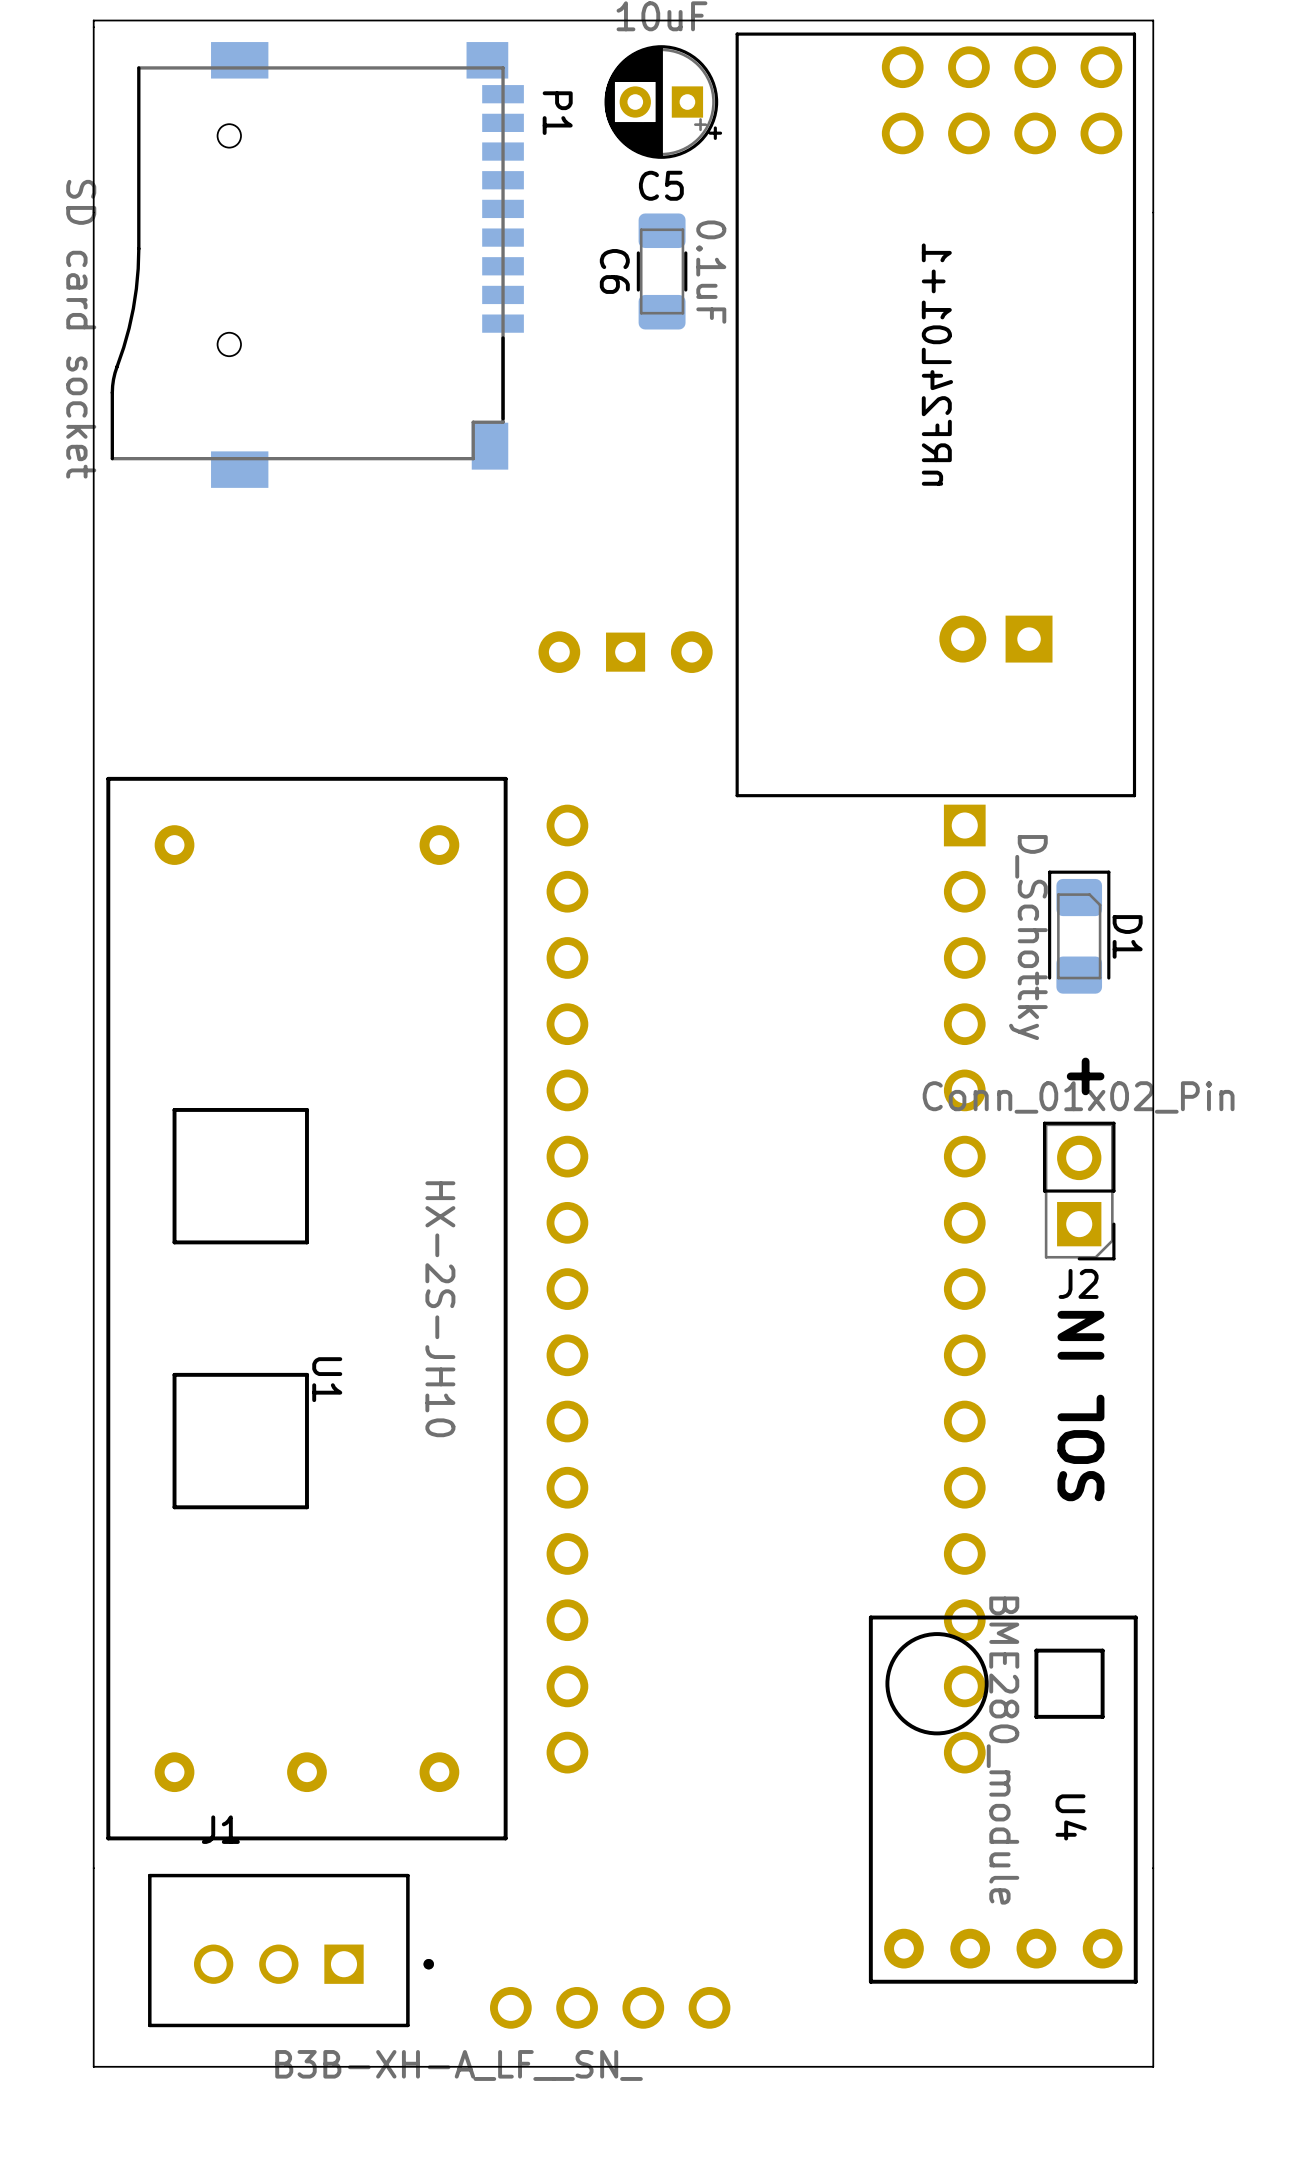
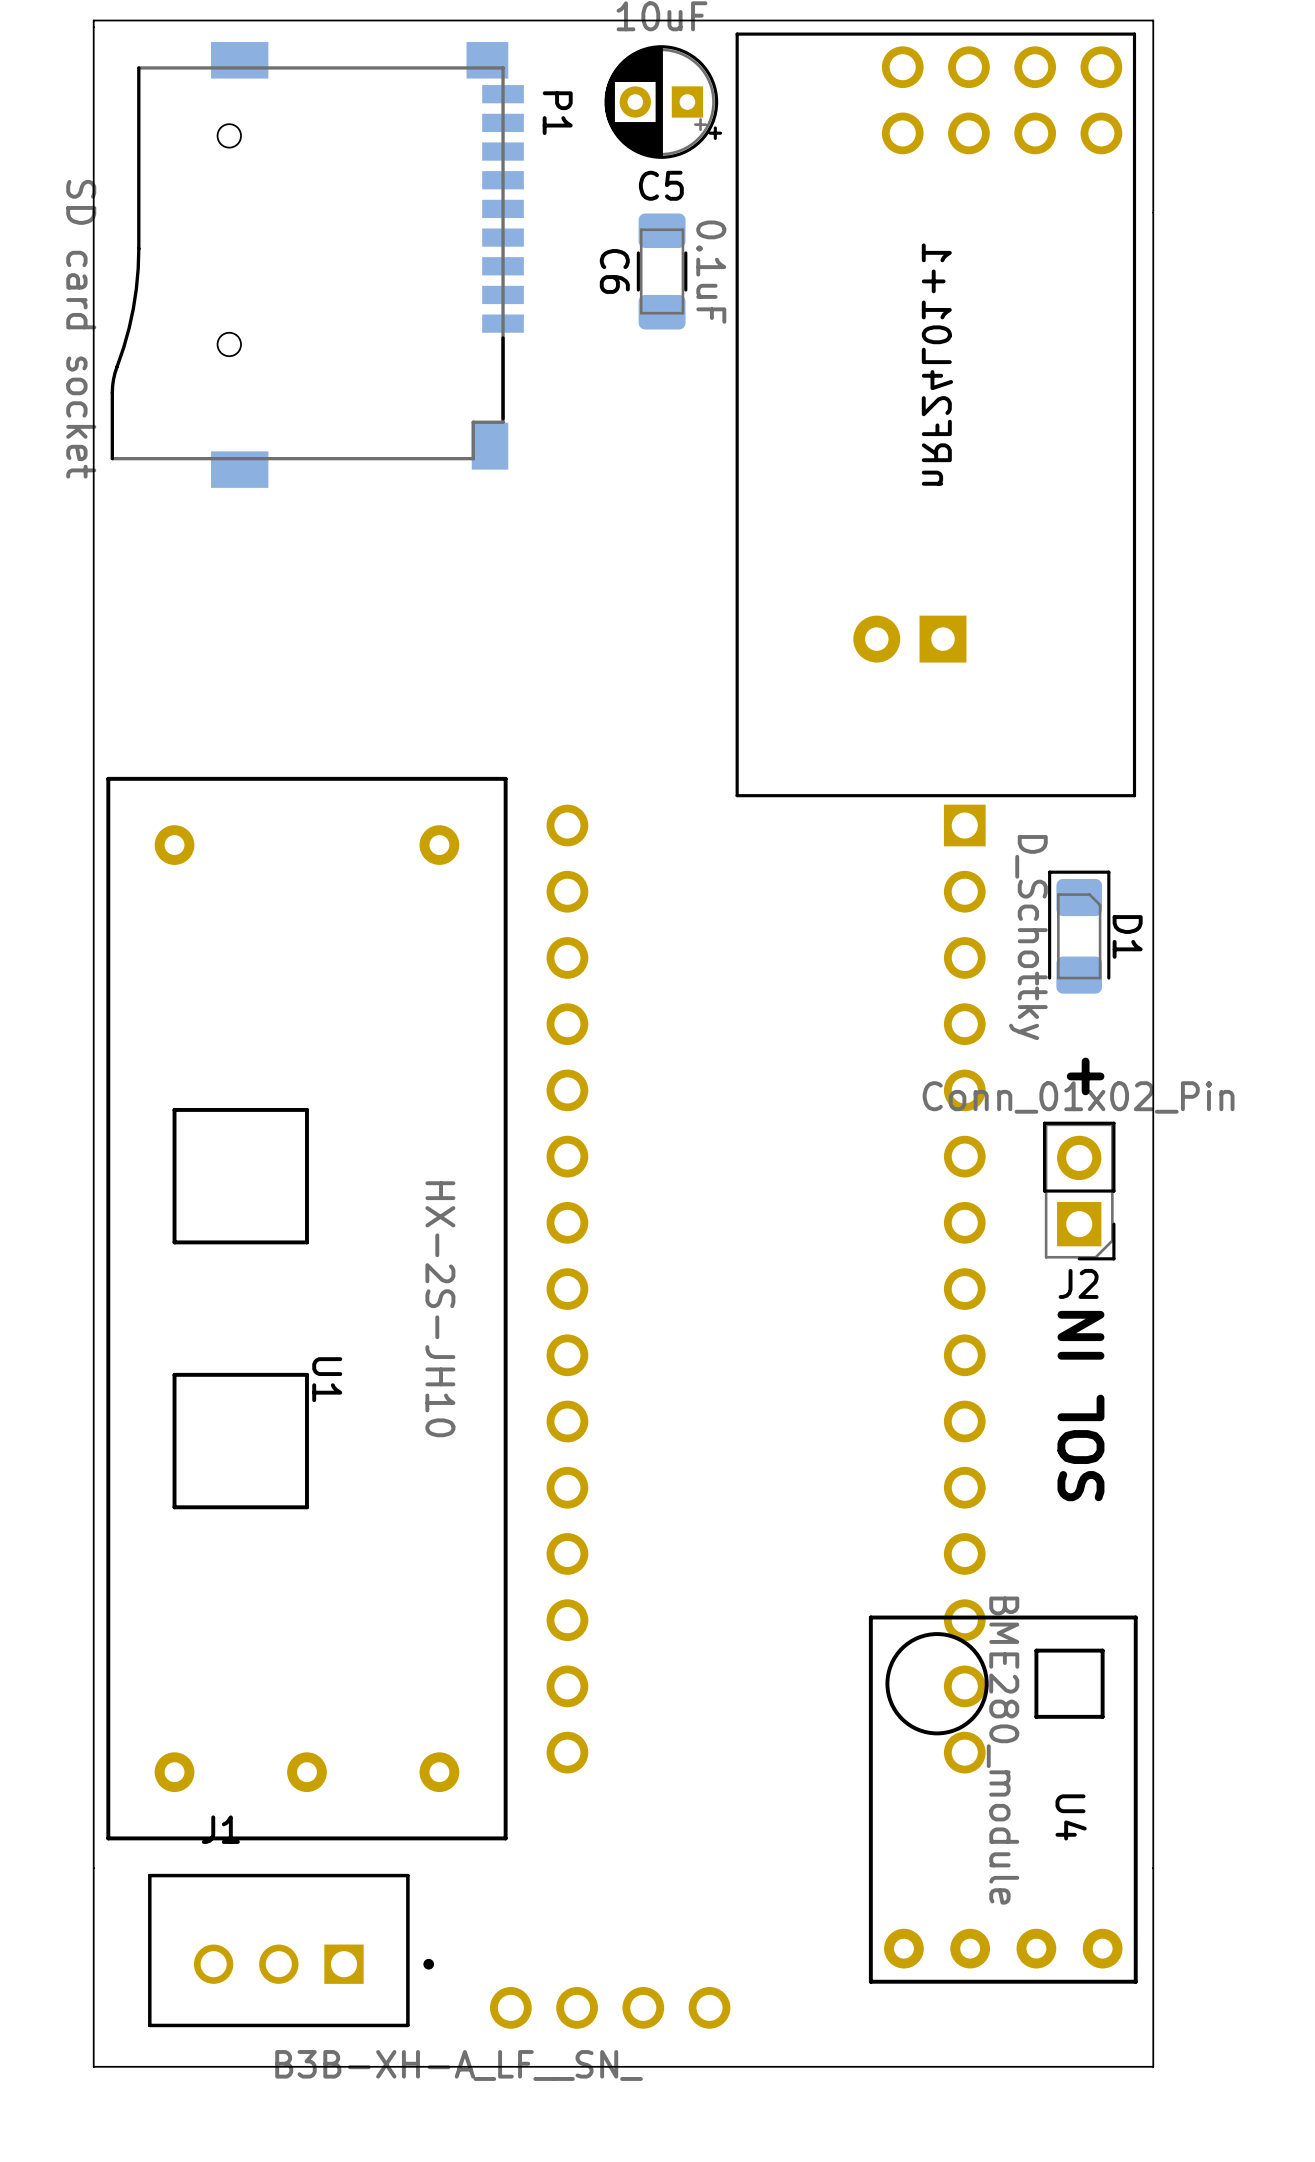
part position: (995, 639) -> (909, 639)
part: (625, 652) -> none

